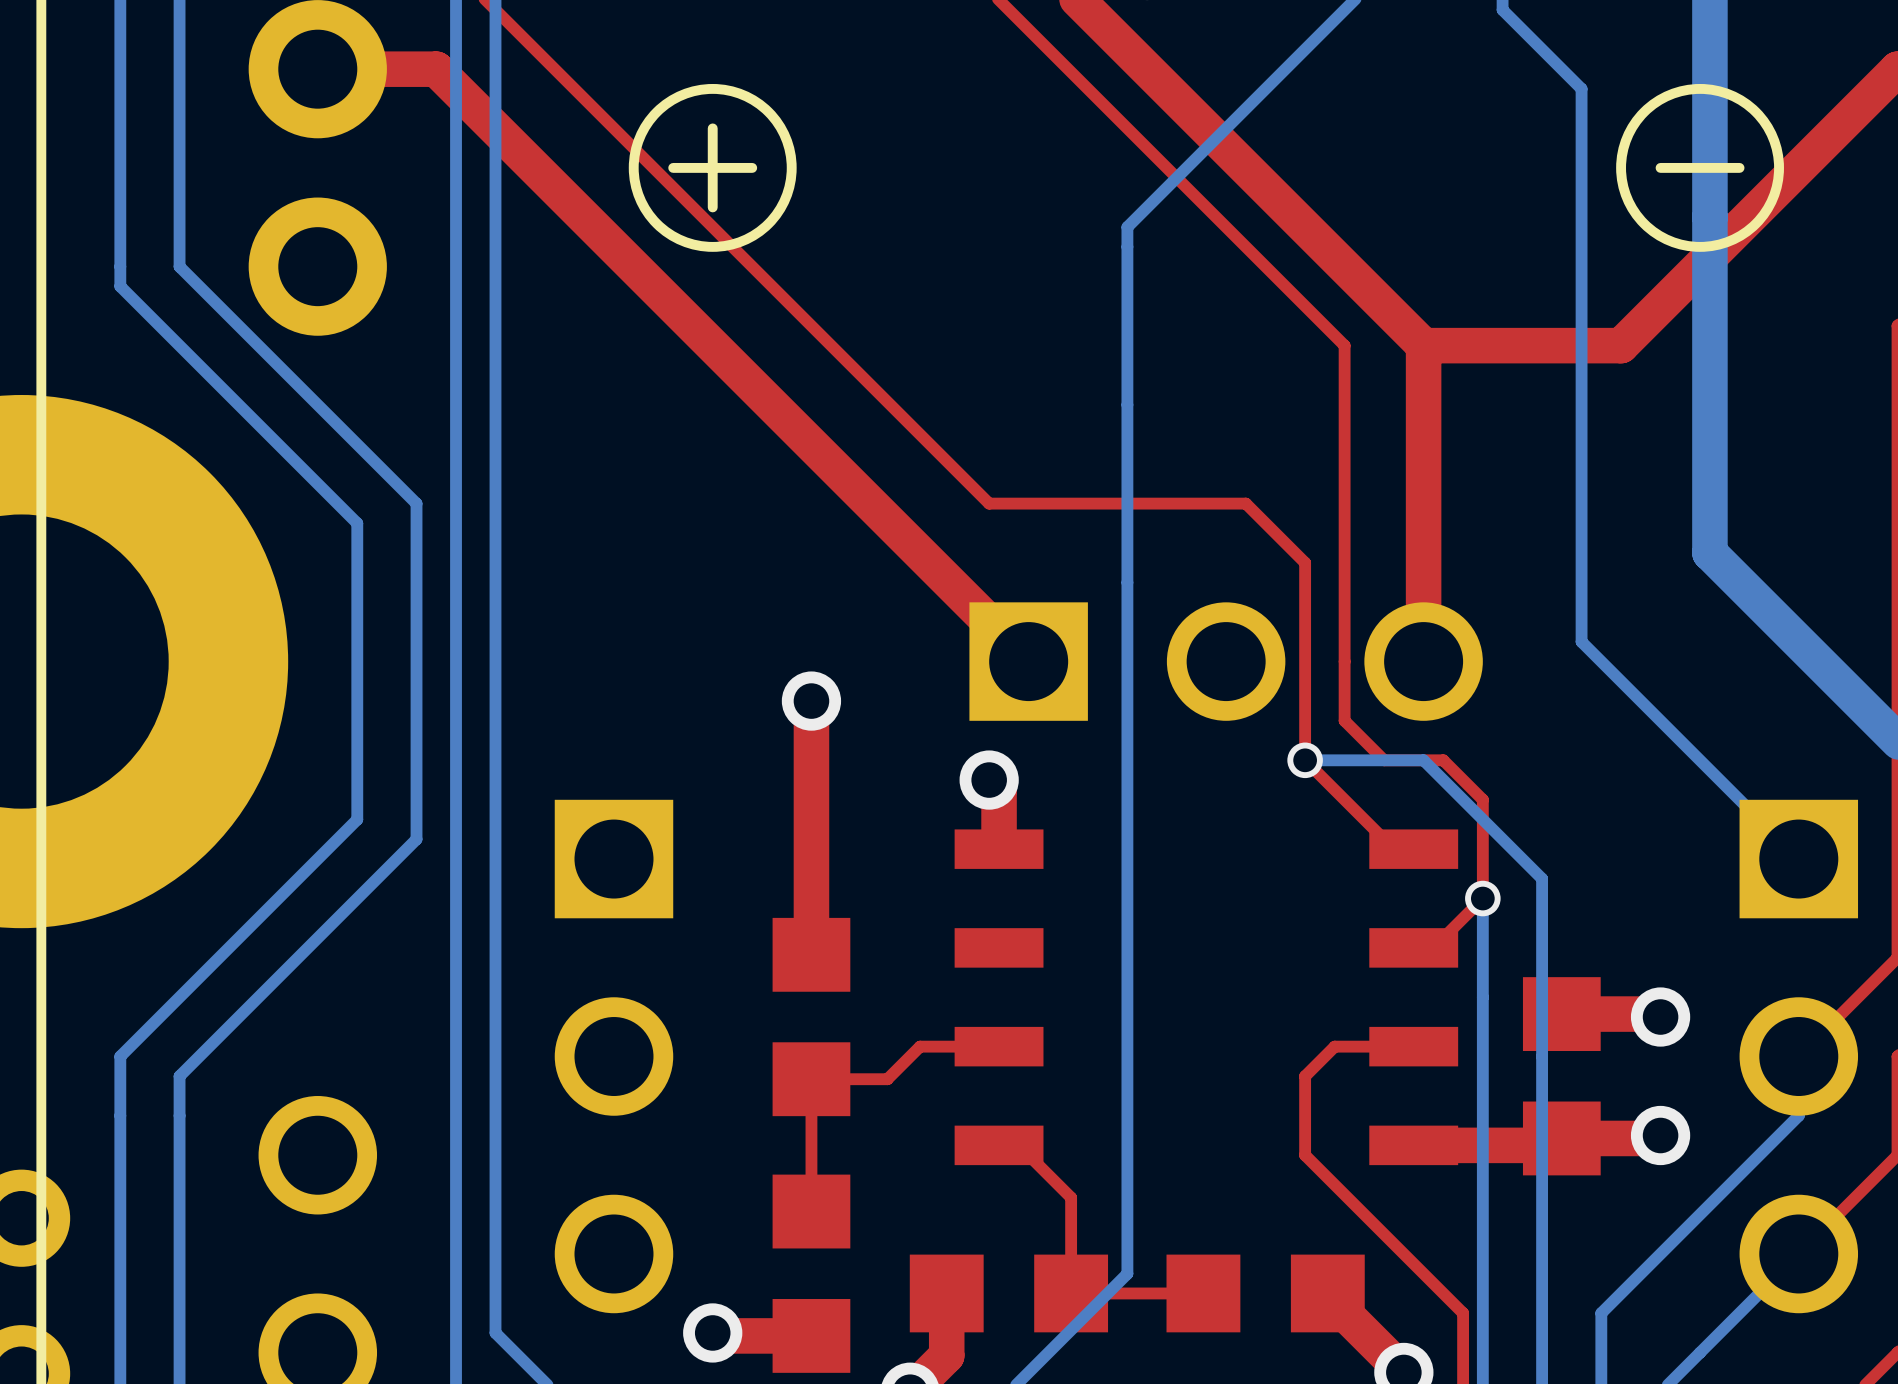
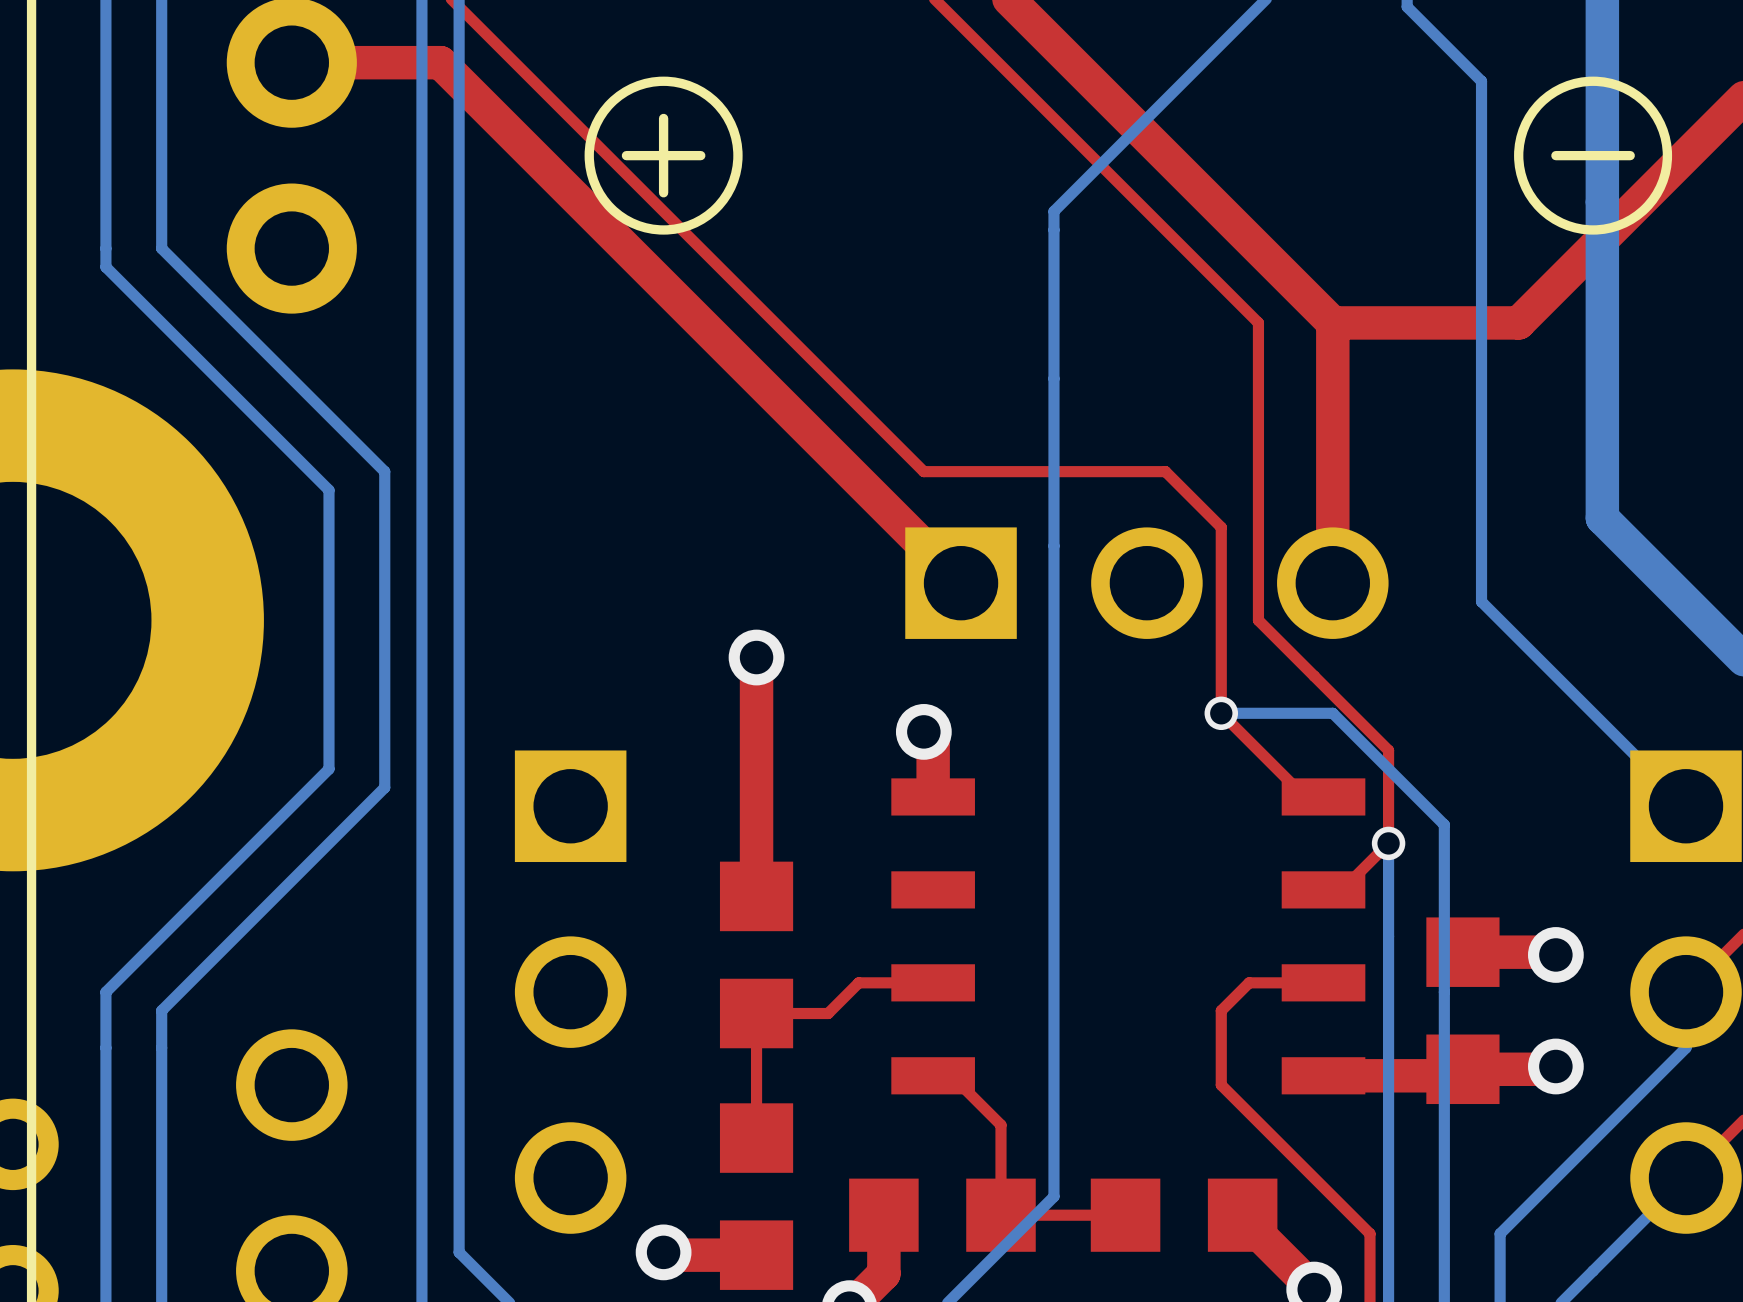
top track: (436, 69) (1028, 661) -> (403, 62) (440, 62) (961, 583)
part position: (1226, 661) -> (1146, 583)
top track: (1344, 661) (1344, 720) (1384, 760) (1443, 760) -> (1258, 620) (1351, 713)

